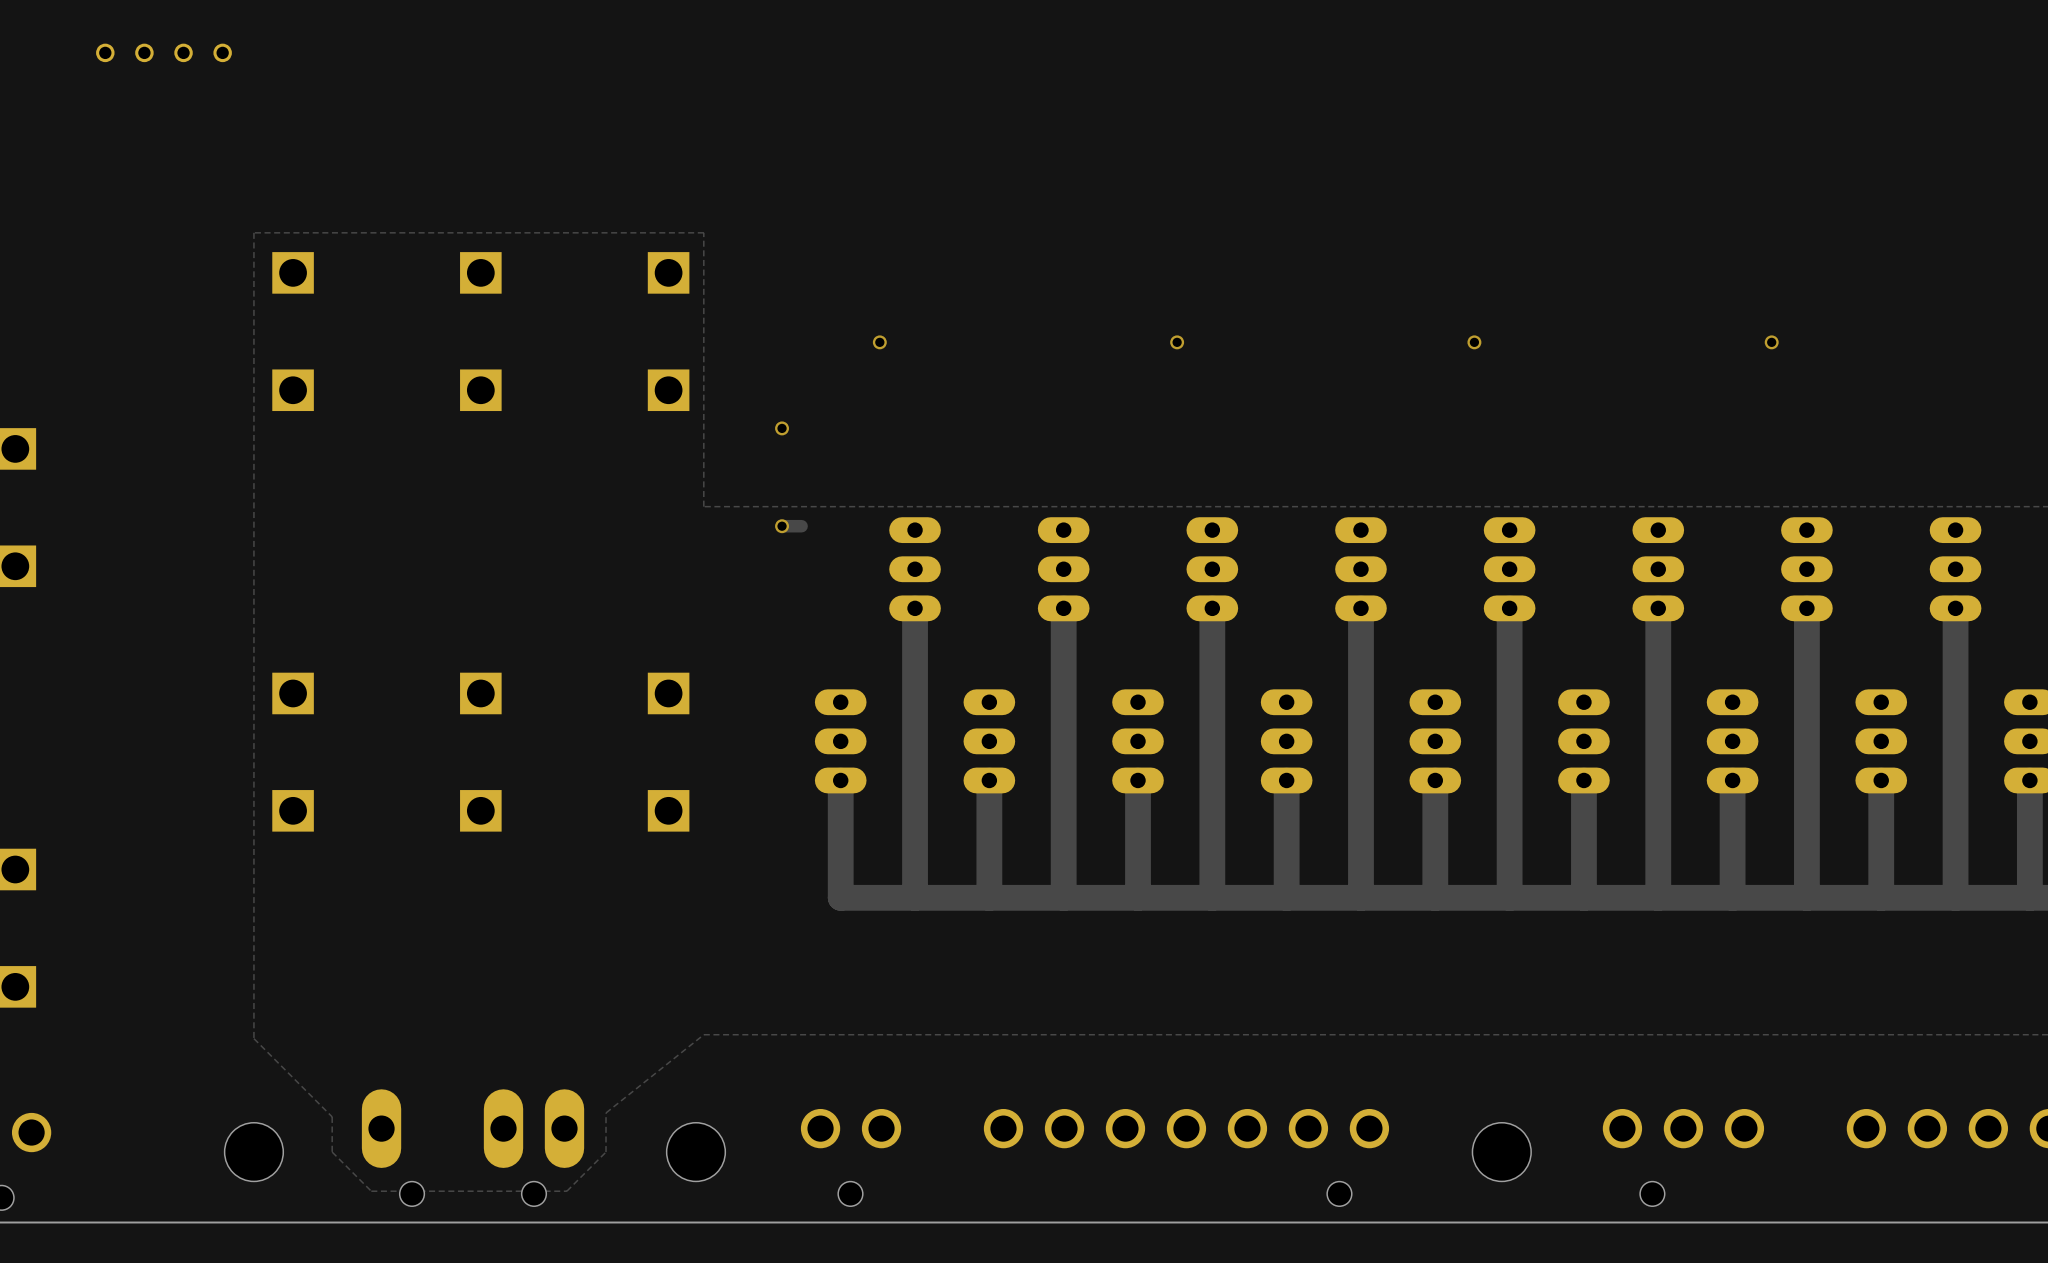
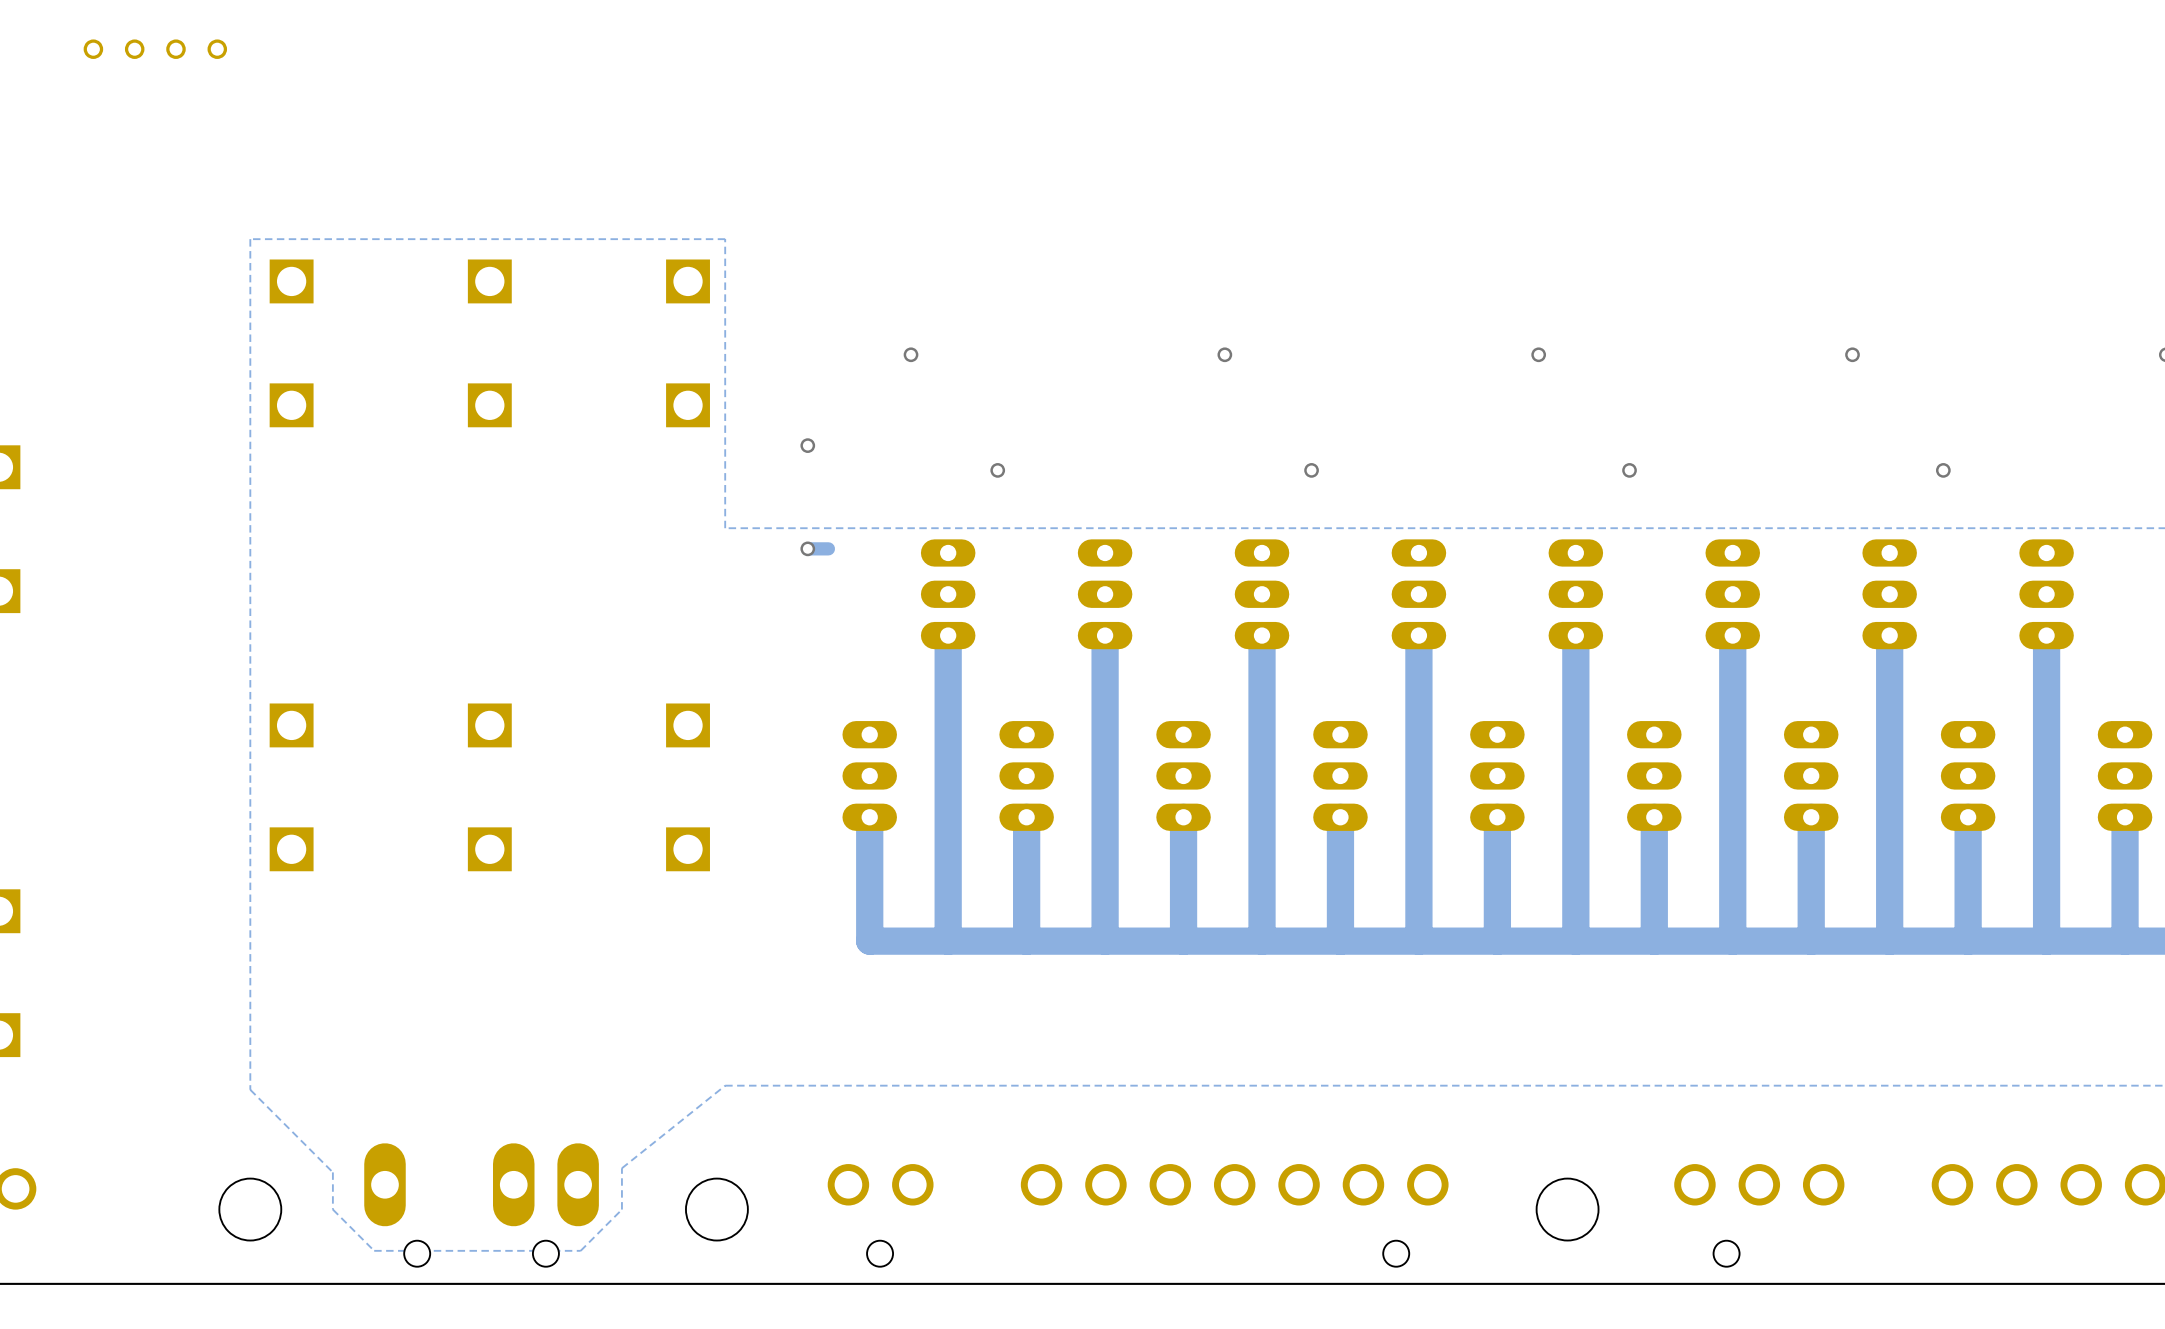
via: none -> (997, 470)
via: none -> (1311, 470)
via: none -> (1629, 470)
via: none -> (1943, 470)

